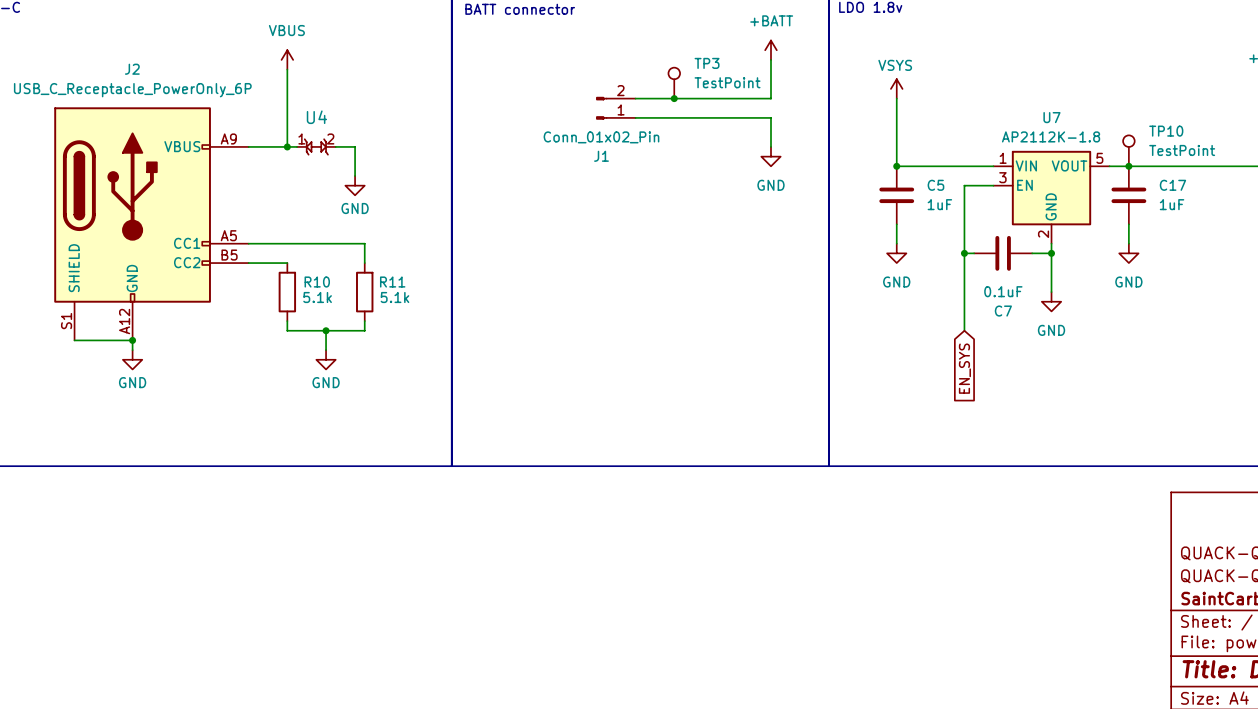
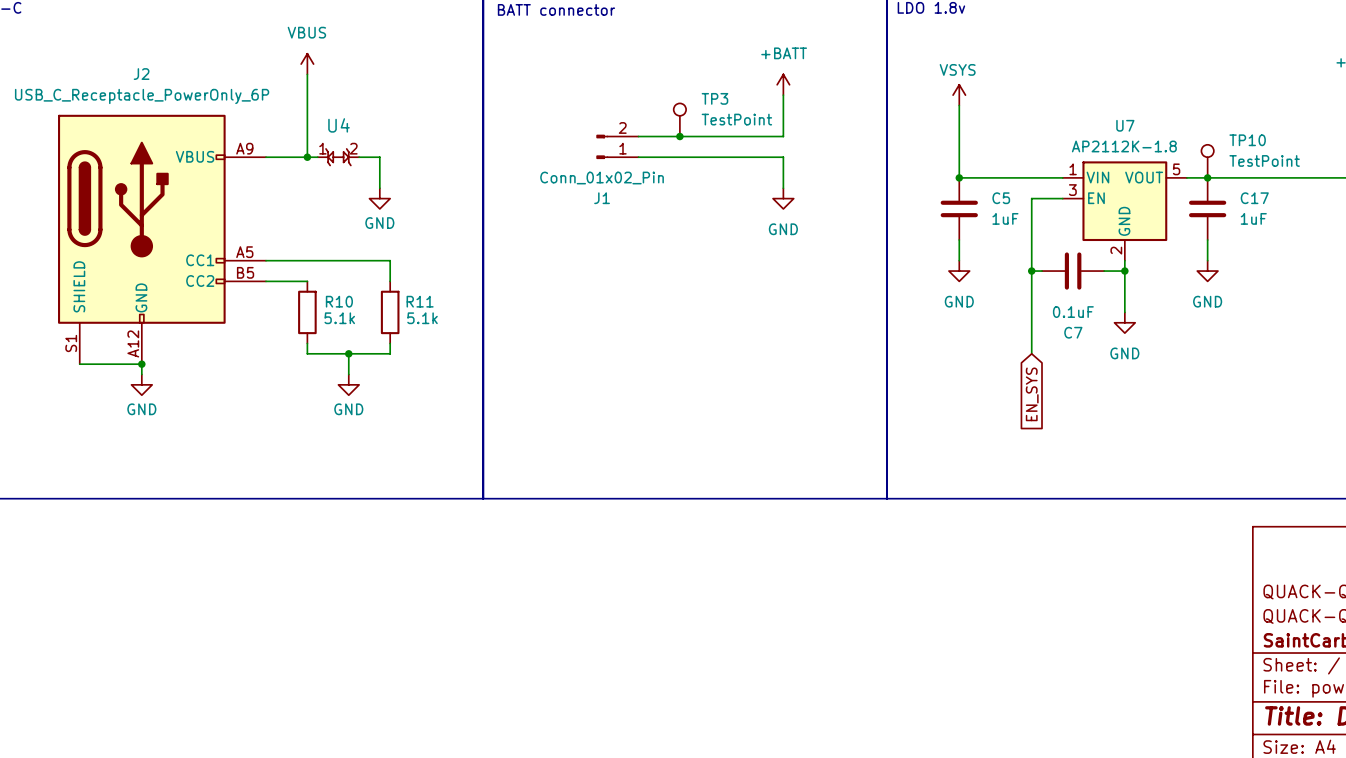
power symbol position: +BATT (770, 50) -> +BATT (783, 84)
wire: (770, 59) (770, 98) (635, 98) -> (783, 95) (783, 136) (638, 136)
TP3 position: (674, 83) -> (679, 119)
junction: (674, 98) -> none
J1 position: (615, 108) -> (617, 146)
wire: (635, 117) (770, 117) (770, 146) -> (638, 157) (783, 157) (783, 188)
junction: none -> (679, 136)
power symbol position: GND (770, 156) -> GND (783, 198)

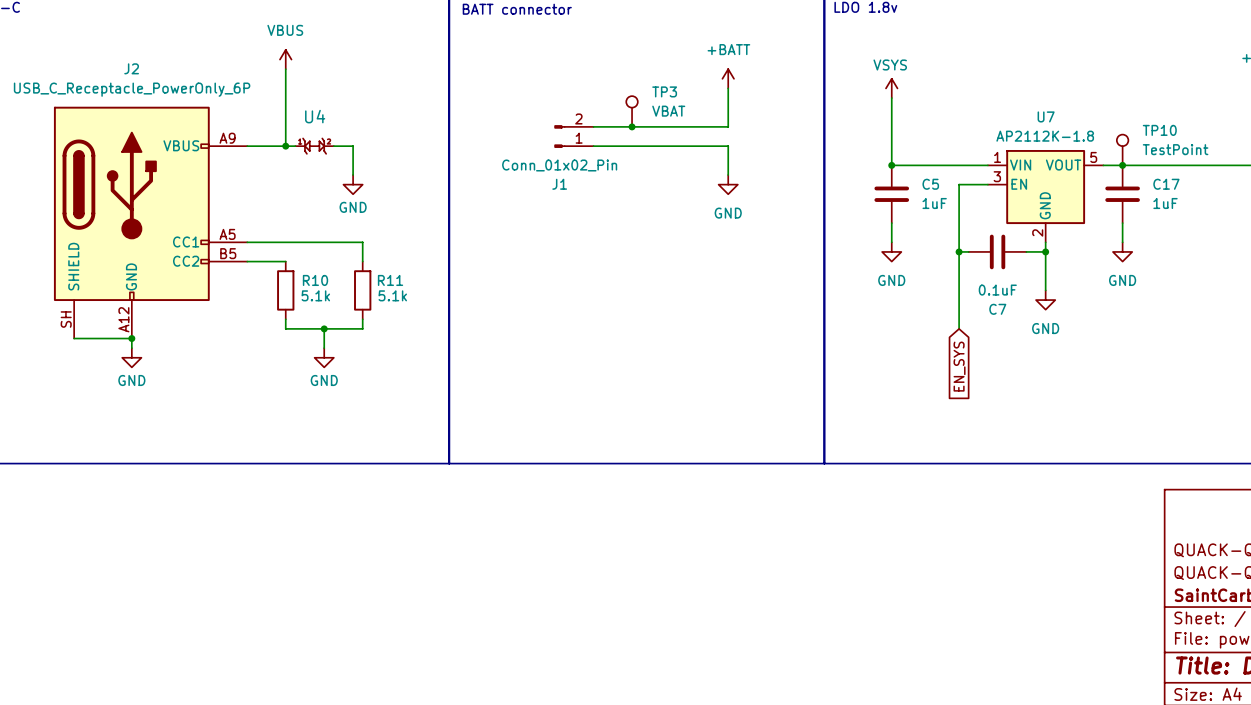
TP3 value: TestPoint (736, 119) -> VBAT (668, 111)
U4 symbol: [317, 148, 360, 166] -> [295, 138, 334, 155]
J2 pin number: S1 (71, 343) -> SH (66, 319)

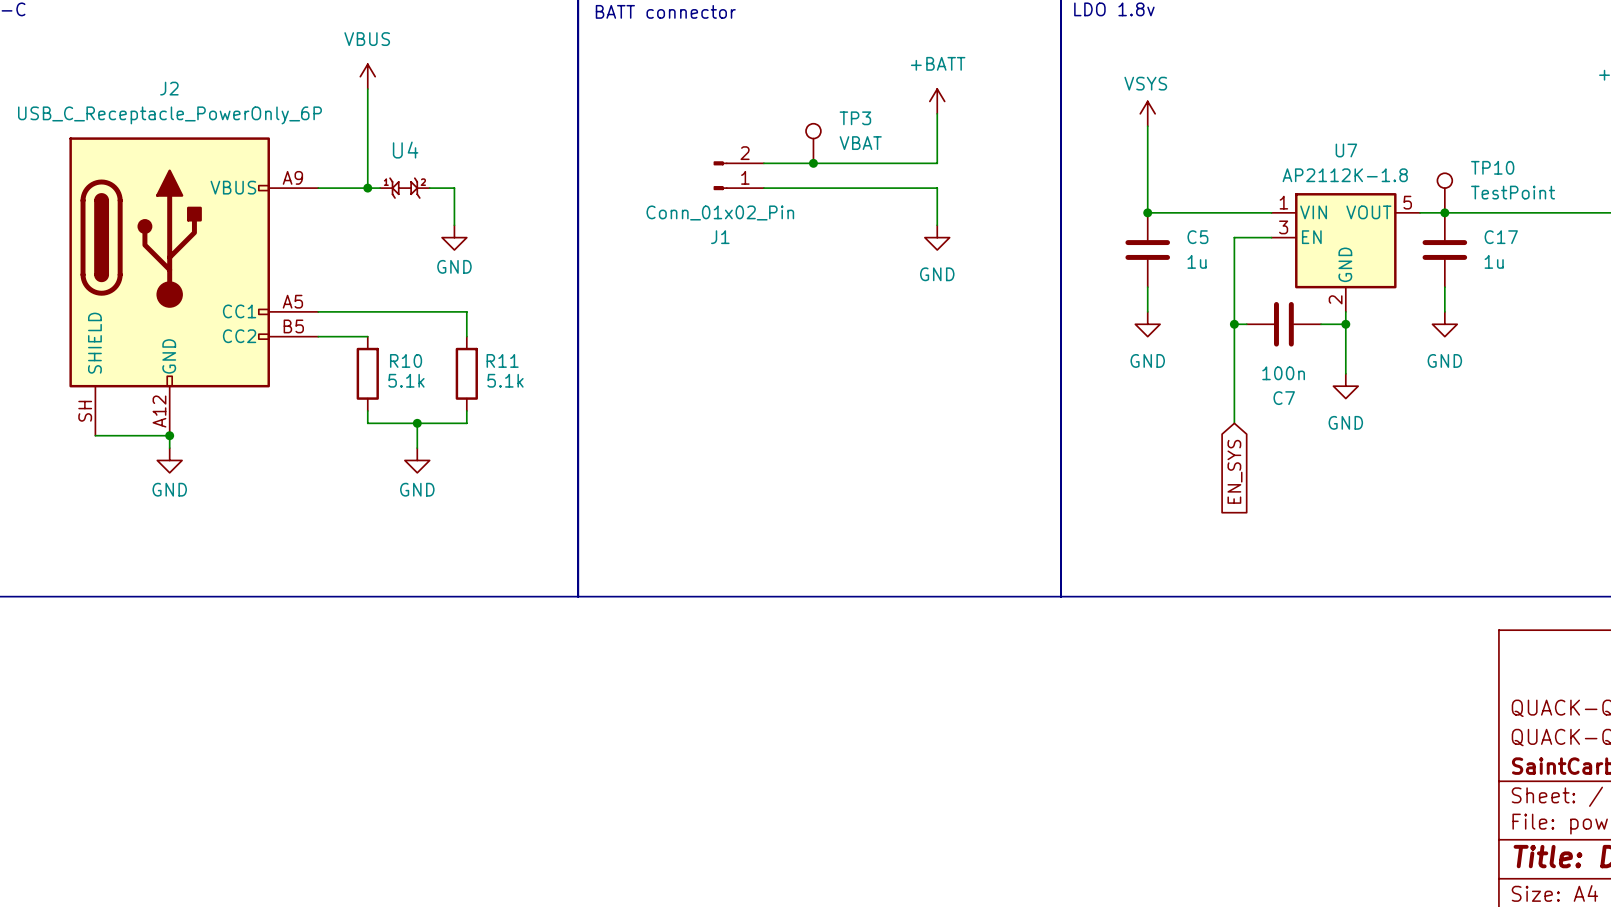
C5 value: 1uF (934, 203) -> 1u (1197, 261)
C17 value: 1uF (1165, 203) -> 1u (1494, 261)
C7 value: 0.1uF (997, 290) -> 100n (1283, 373)

